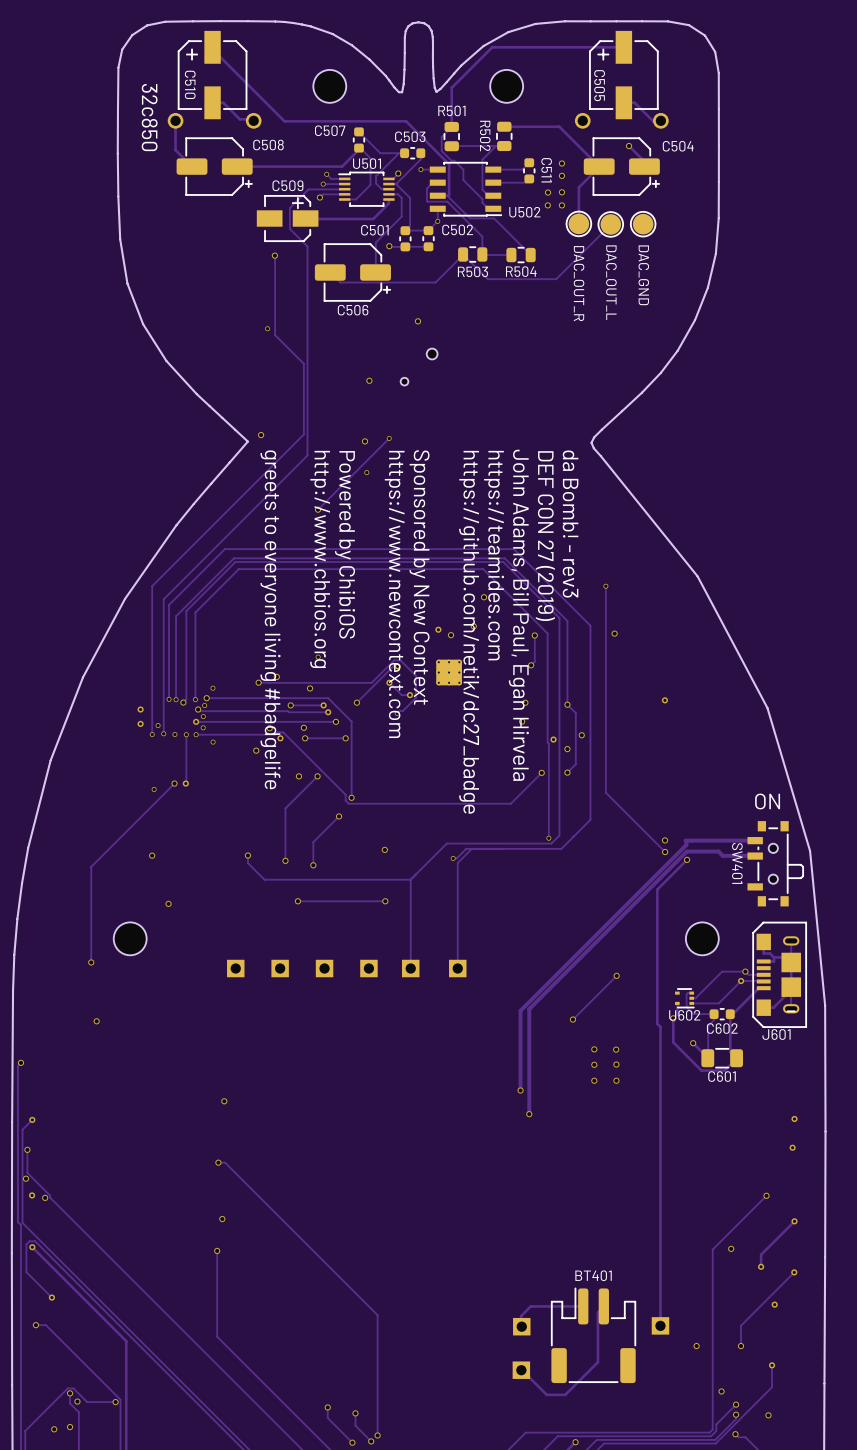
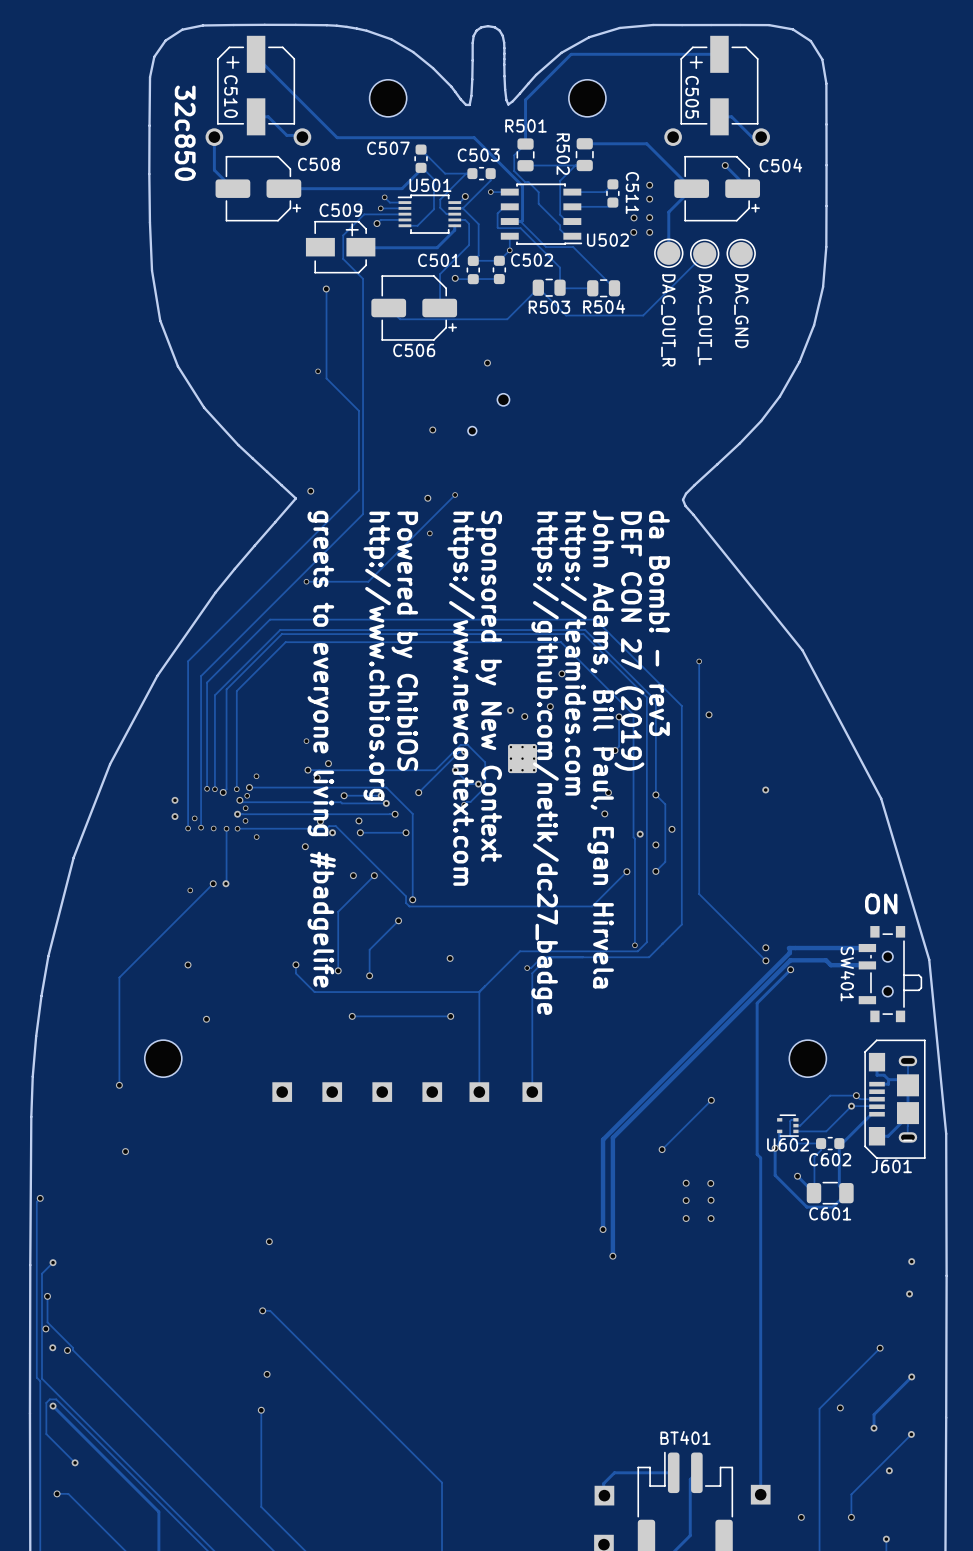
track: none -> (374, 575) (368, 581) (306, 581)
via: (318, 509) -> none
via: none -> (306, 581)
via position: (318, 657) -> (306, 741)
via position: (310, 688) -> (317, 777)

